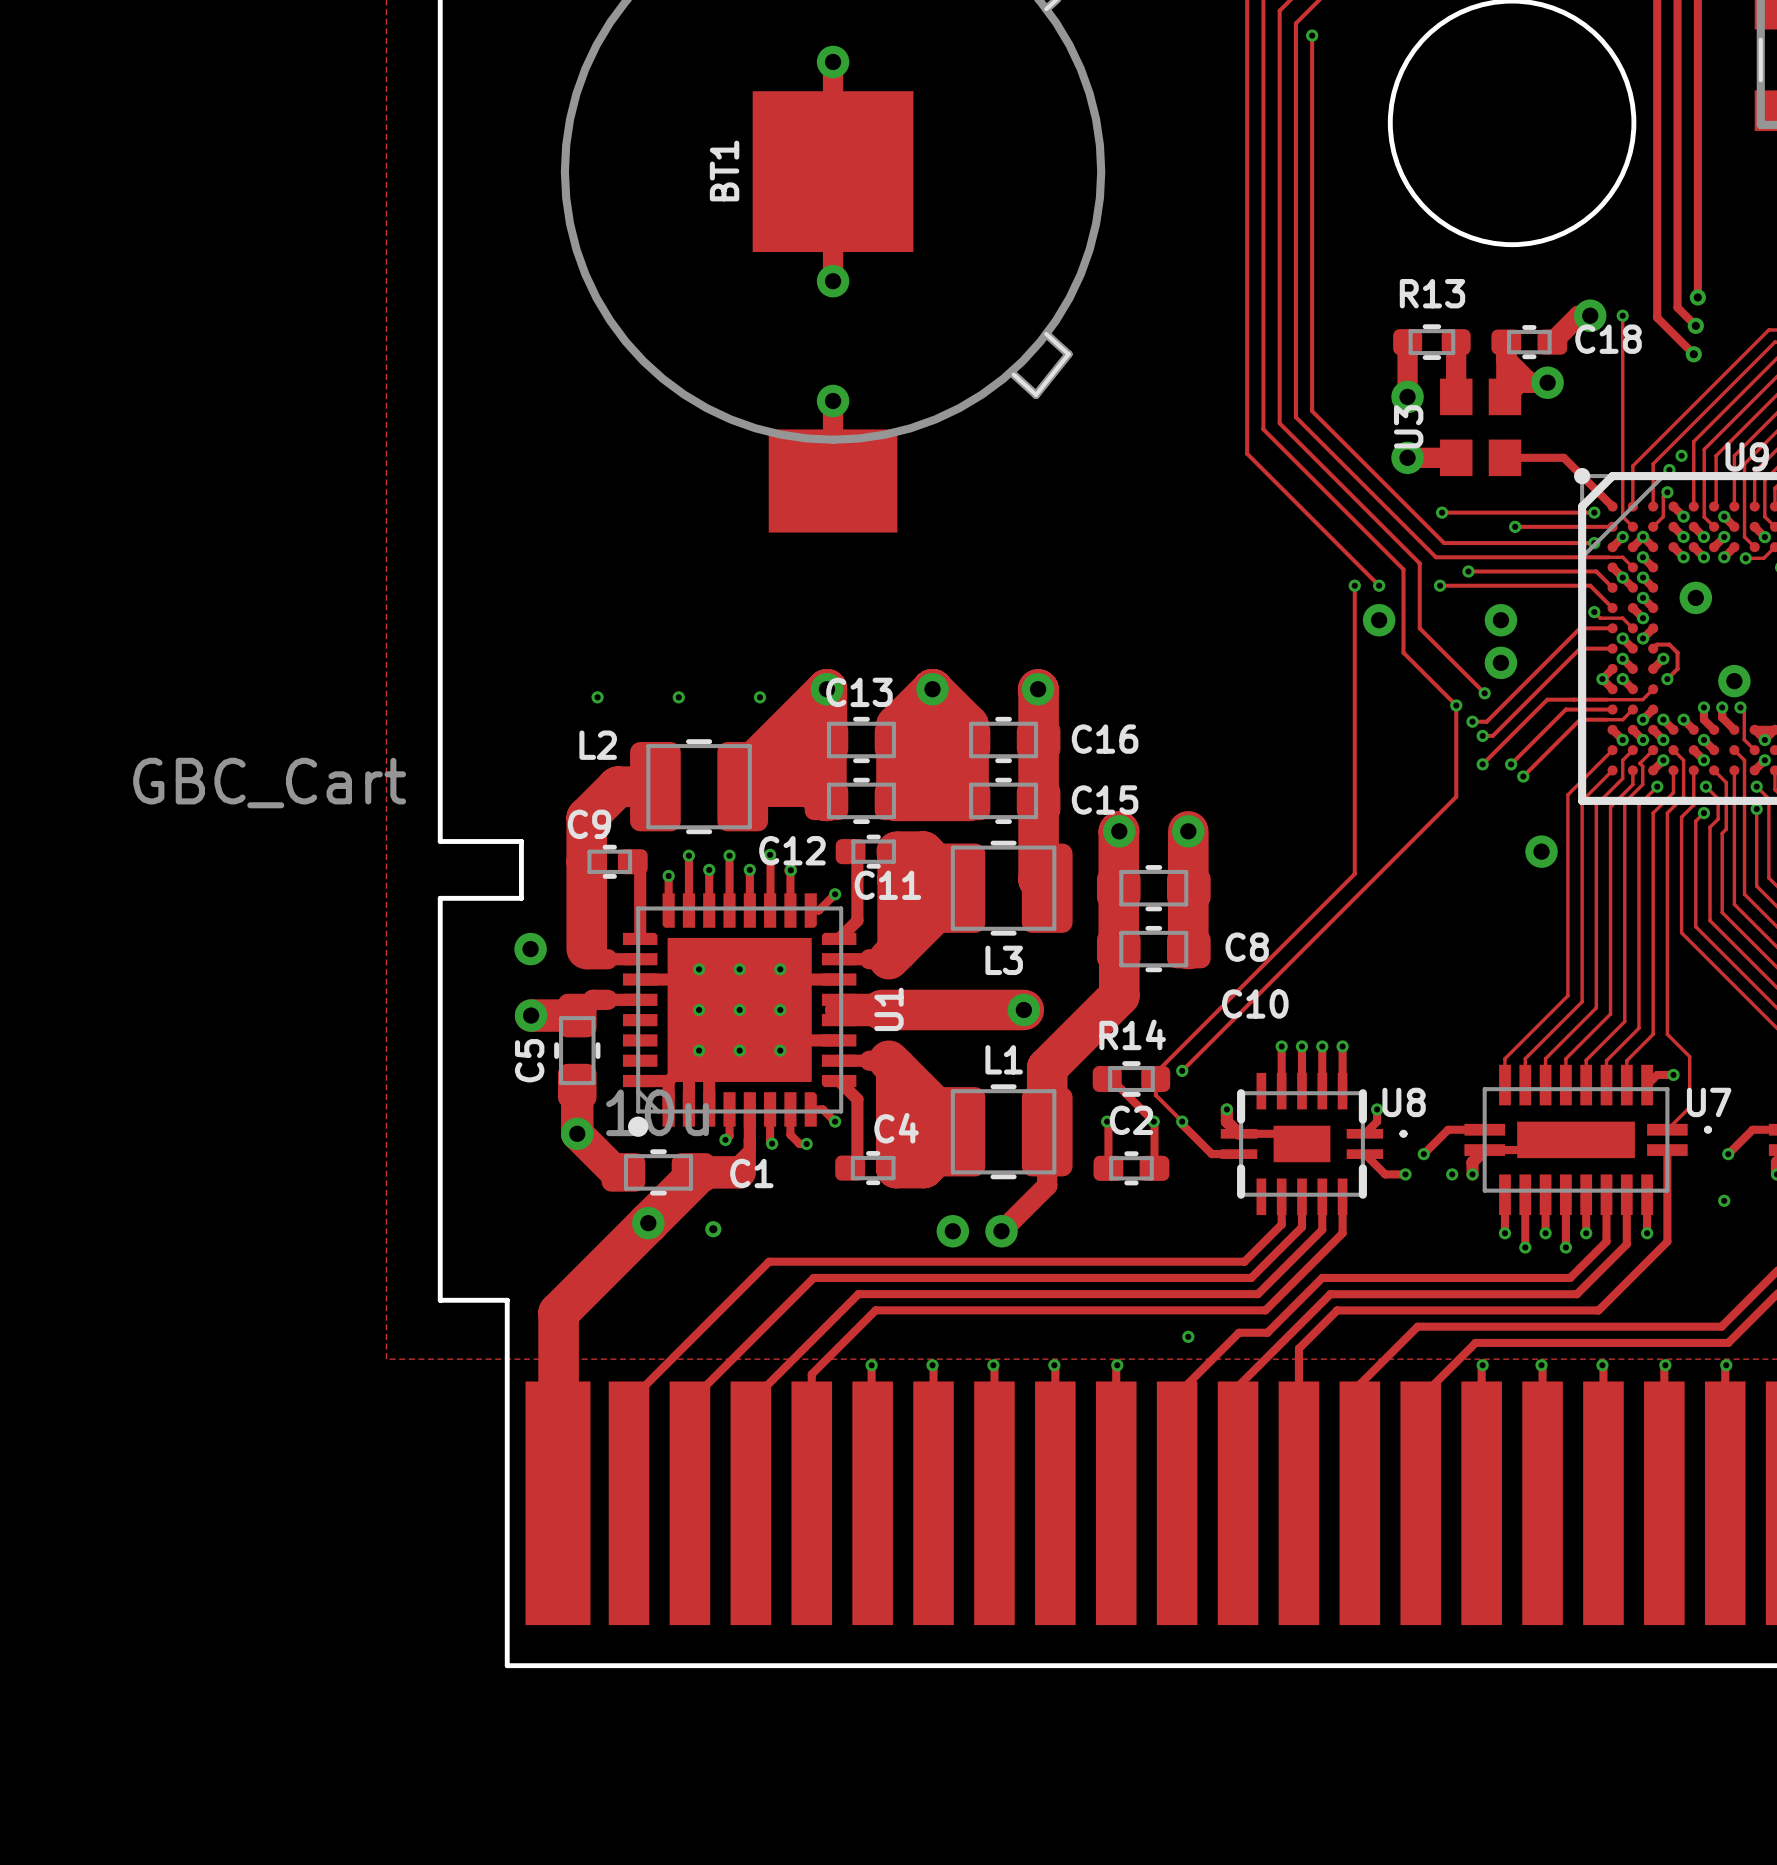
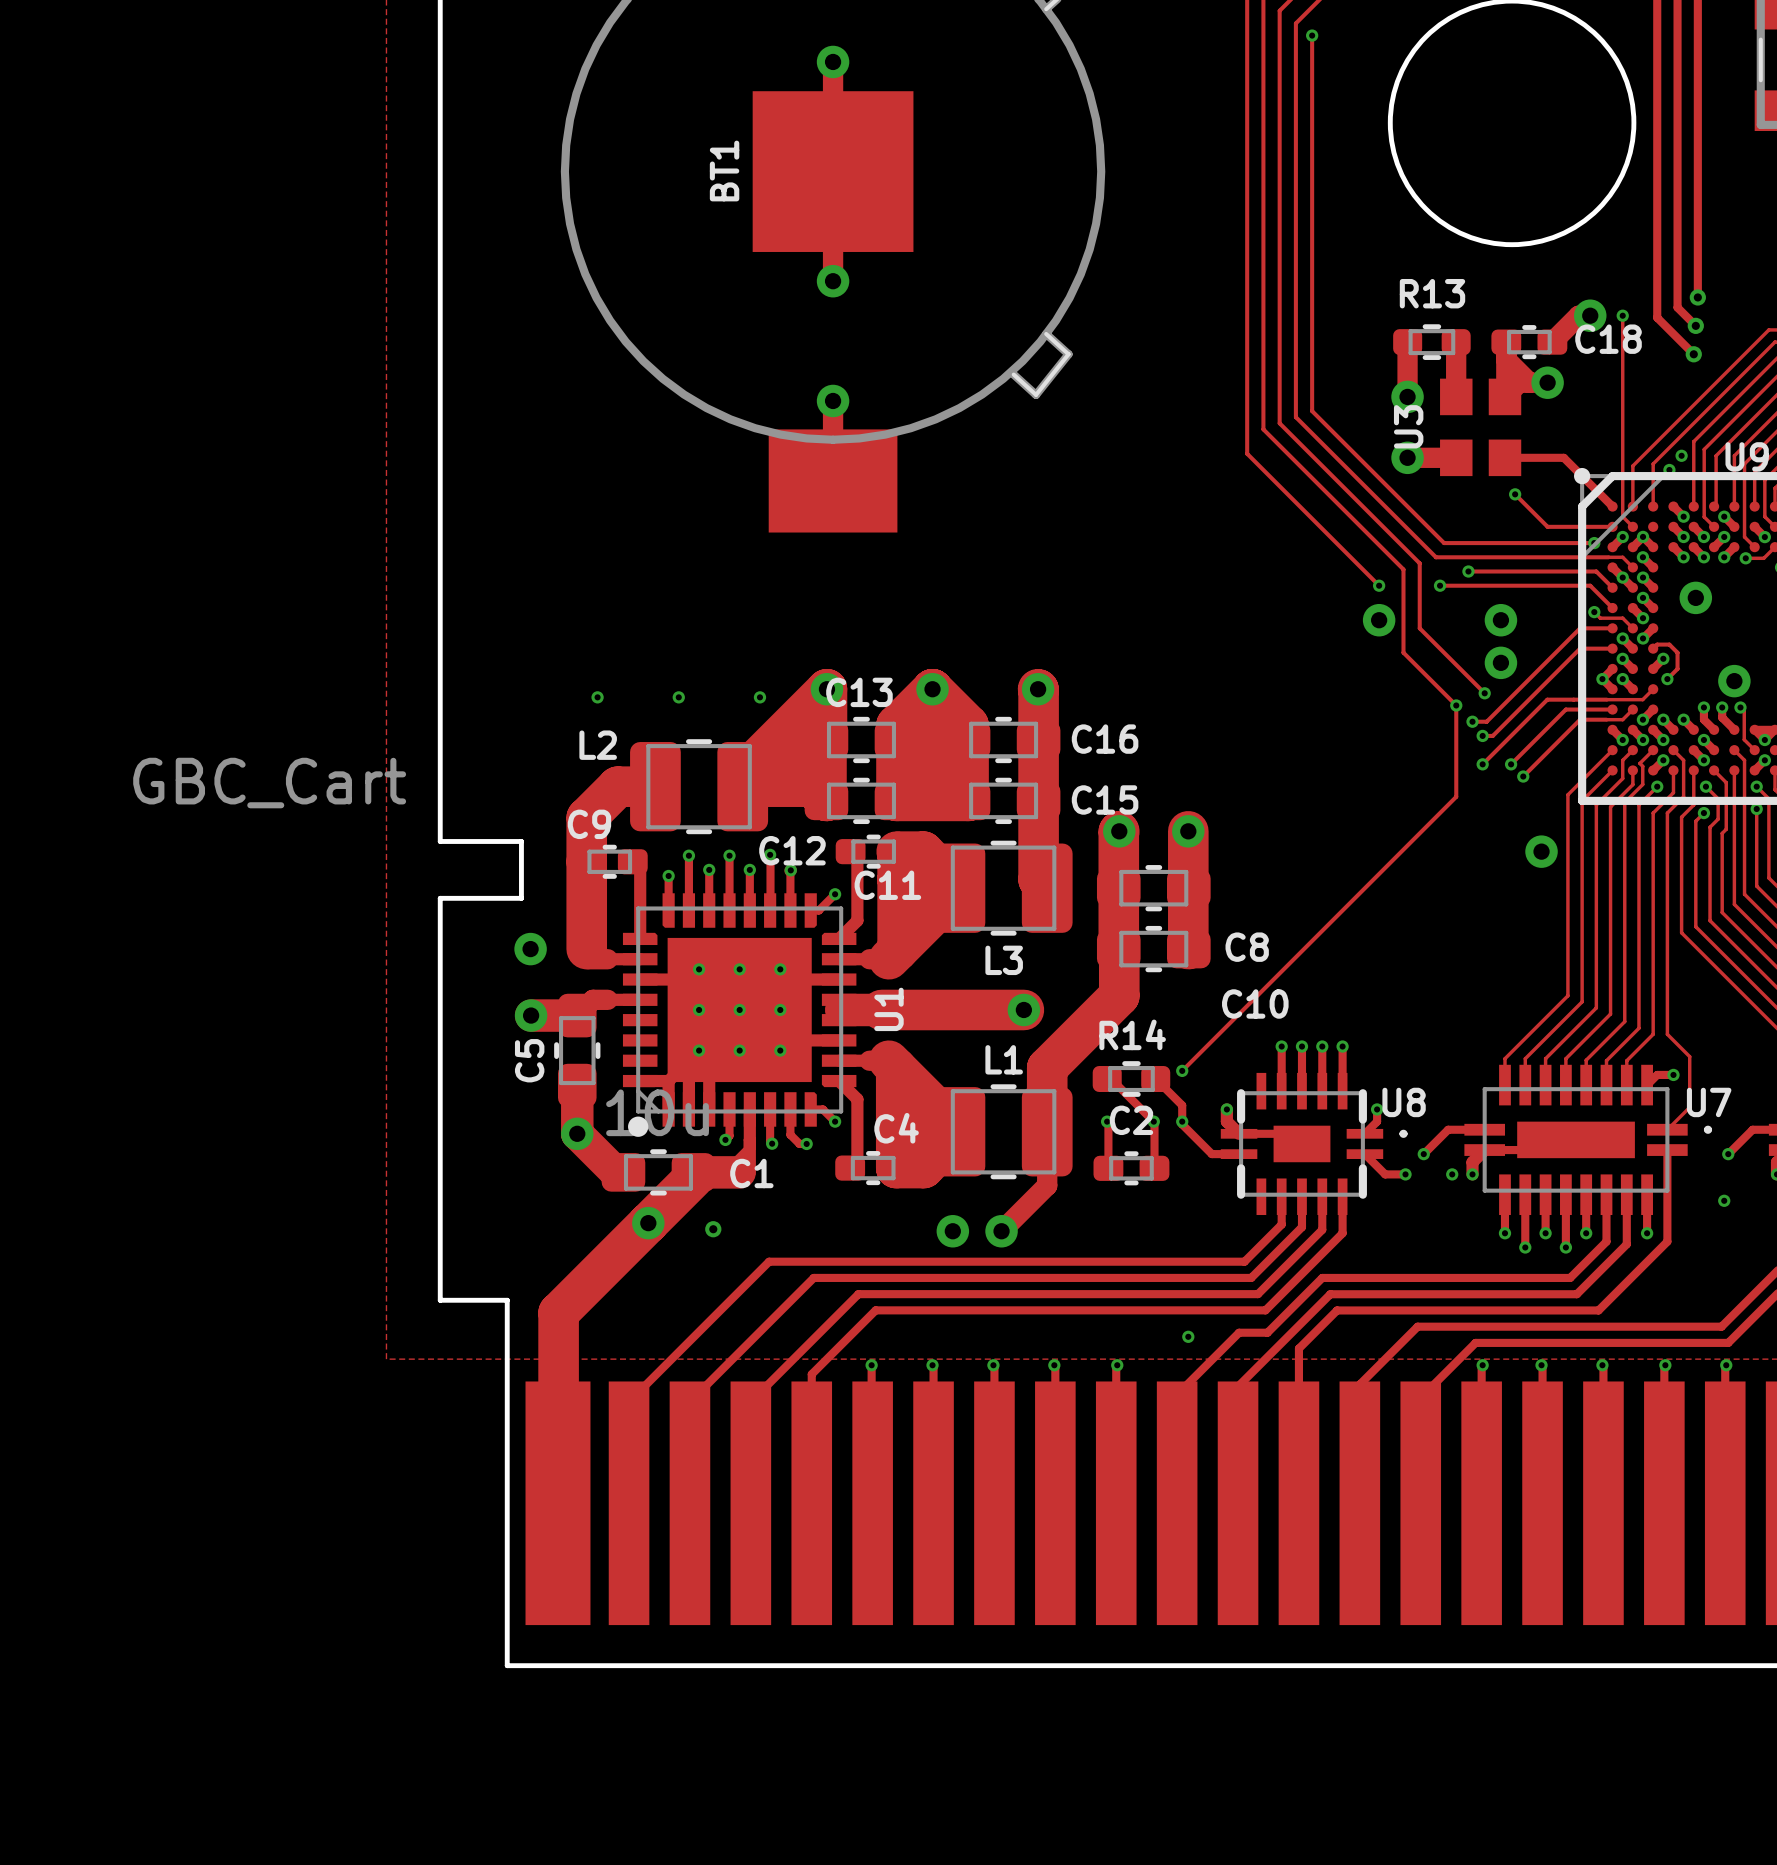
track: (1667, 492) (1663, 496) (1663, 516) (1653, 526) -> none
via: (1667, 492) -> none
track: (1442, 512) (1594, 512) -> none
via: (1442, 512) -> none
via: (1594, 512) -> none
track: (1515, 526) (1547, 526) -> (1515, 494) (1547, 526)
via position: (1515, 526) -> (1515, 494)
track: (1354, 585) (1354, 873) (1155, 1073) (1155, 1095) (1182, 1121) -> (1155, 1079) (1182, 1105) (1182, 1121)
via: (1354, 585) -> none

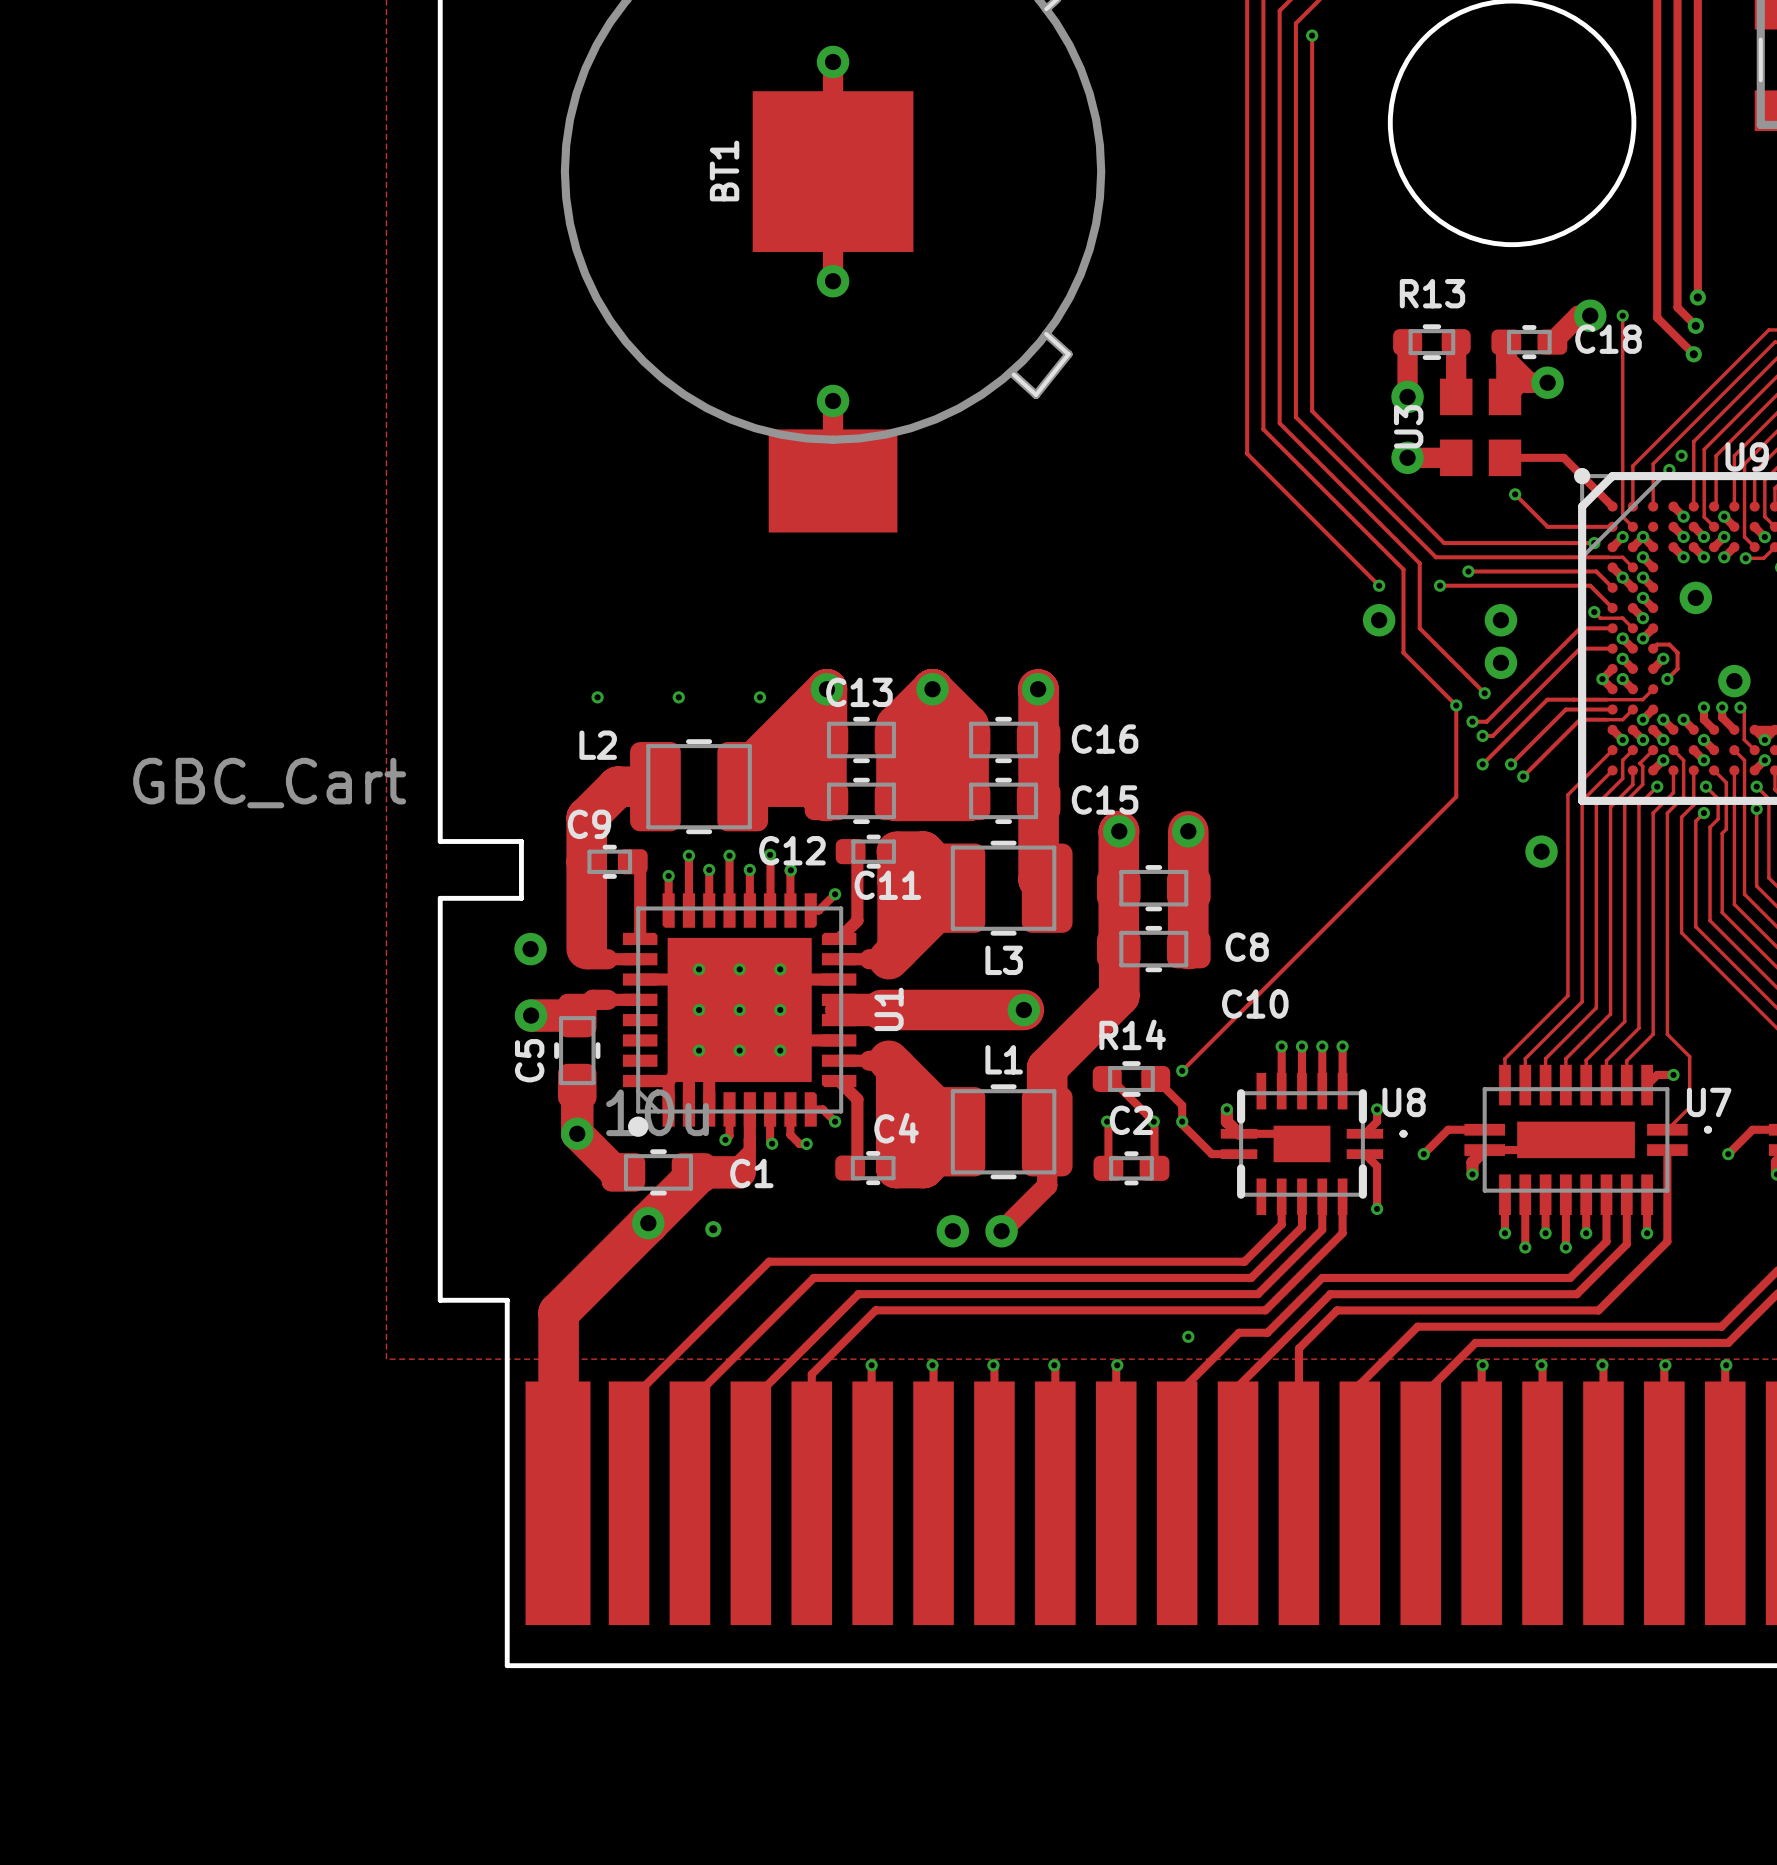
track: (1377, 1166) (1385, 1174) (1405, 1174) -> (1377, 1166) (1377, 1208)
via: (1405, 1174) -> none
via: (1452, 1174) -> none
via: (1724, 1200) -> none
via: none -> (1377, 1208)

